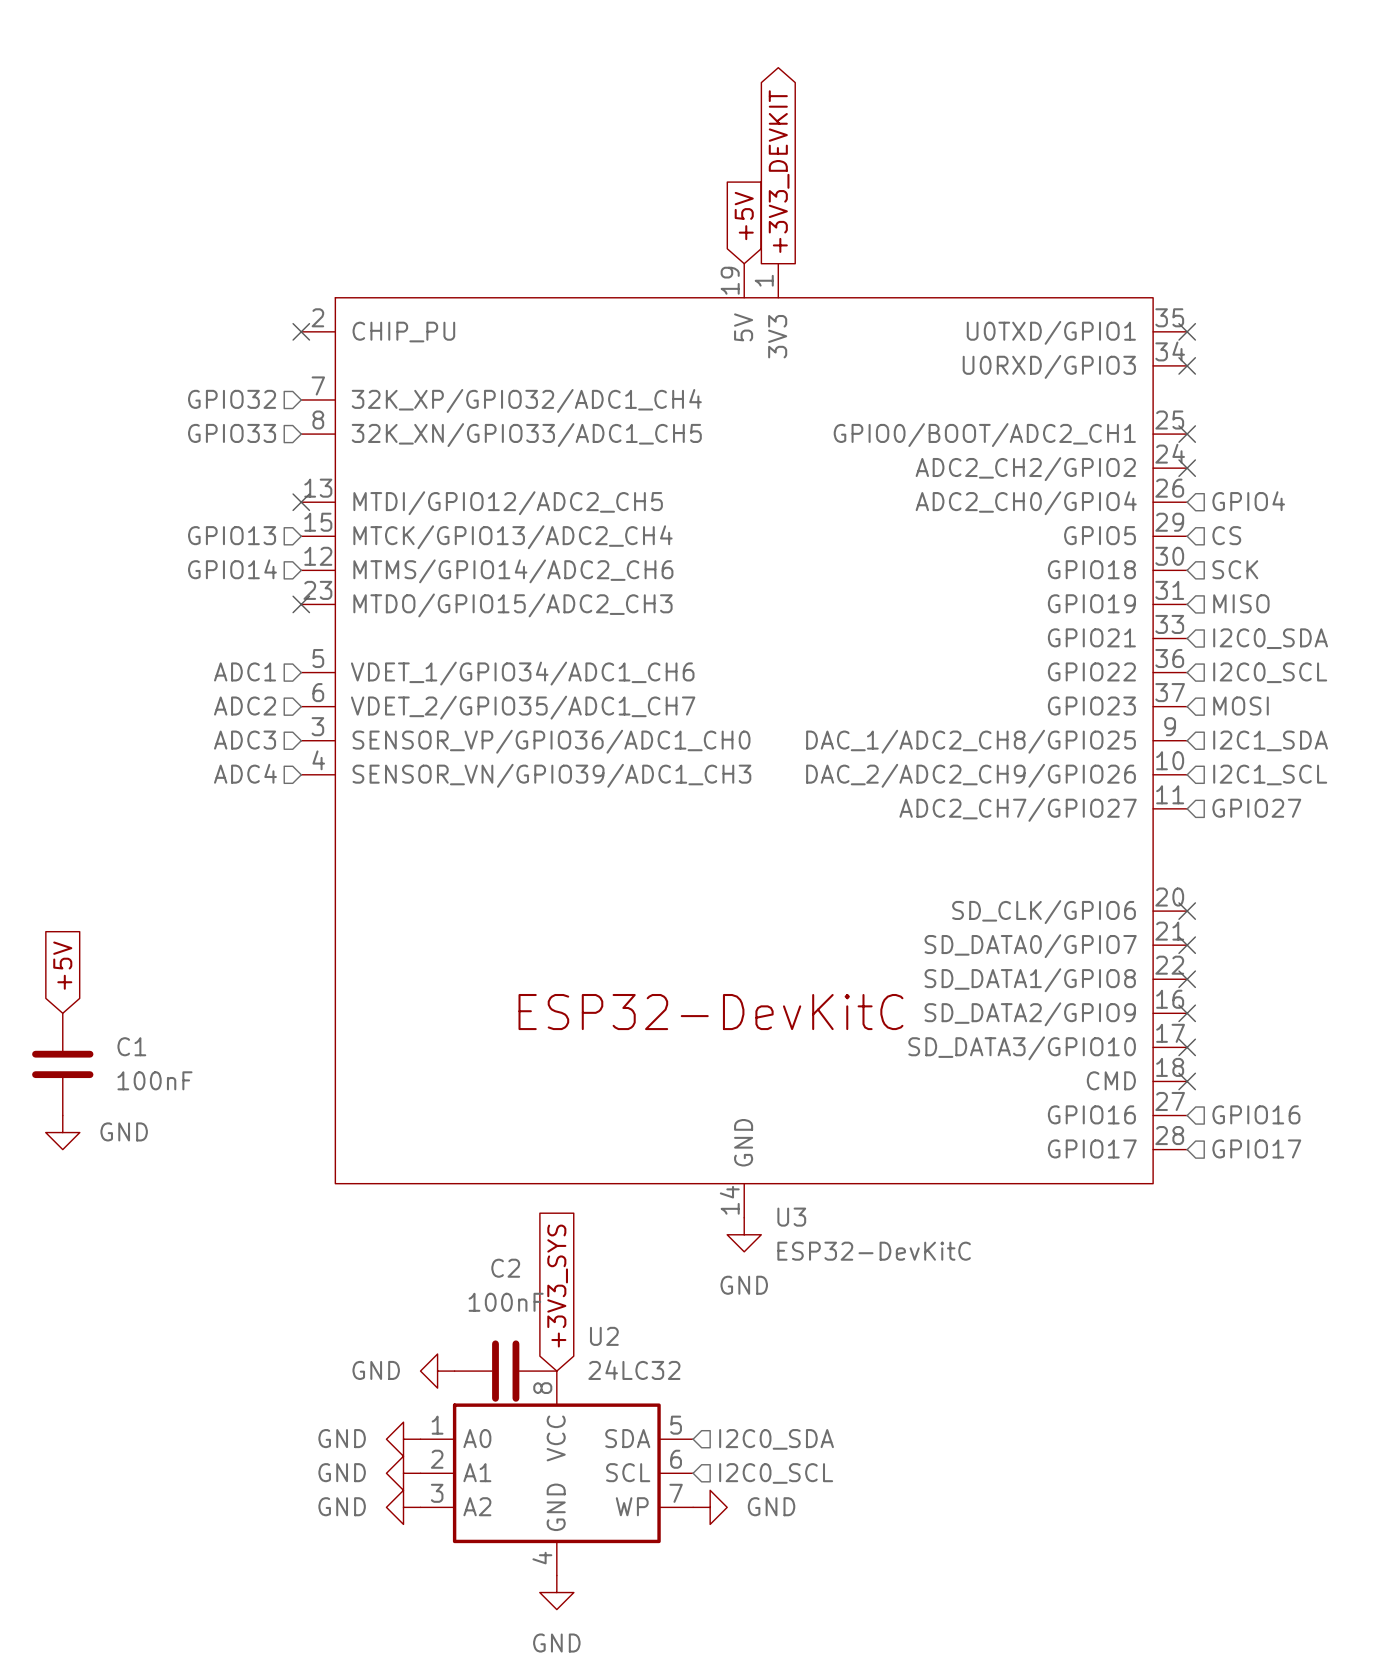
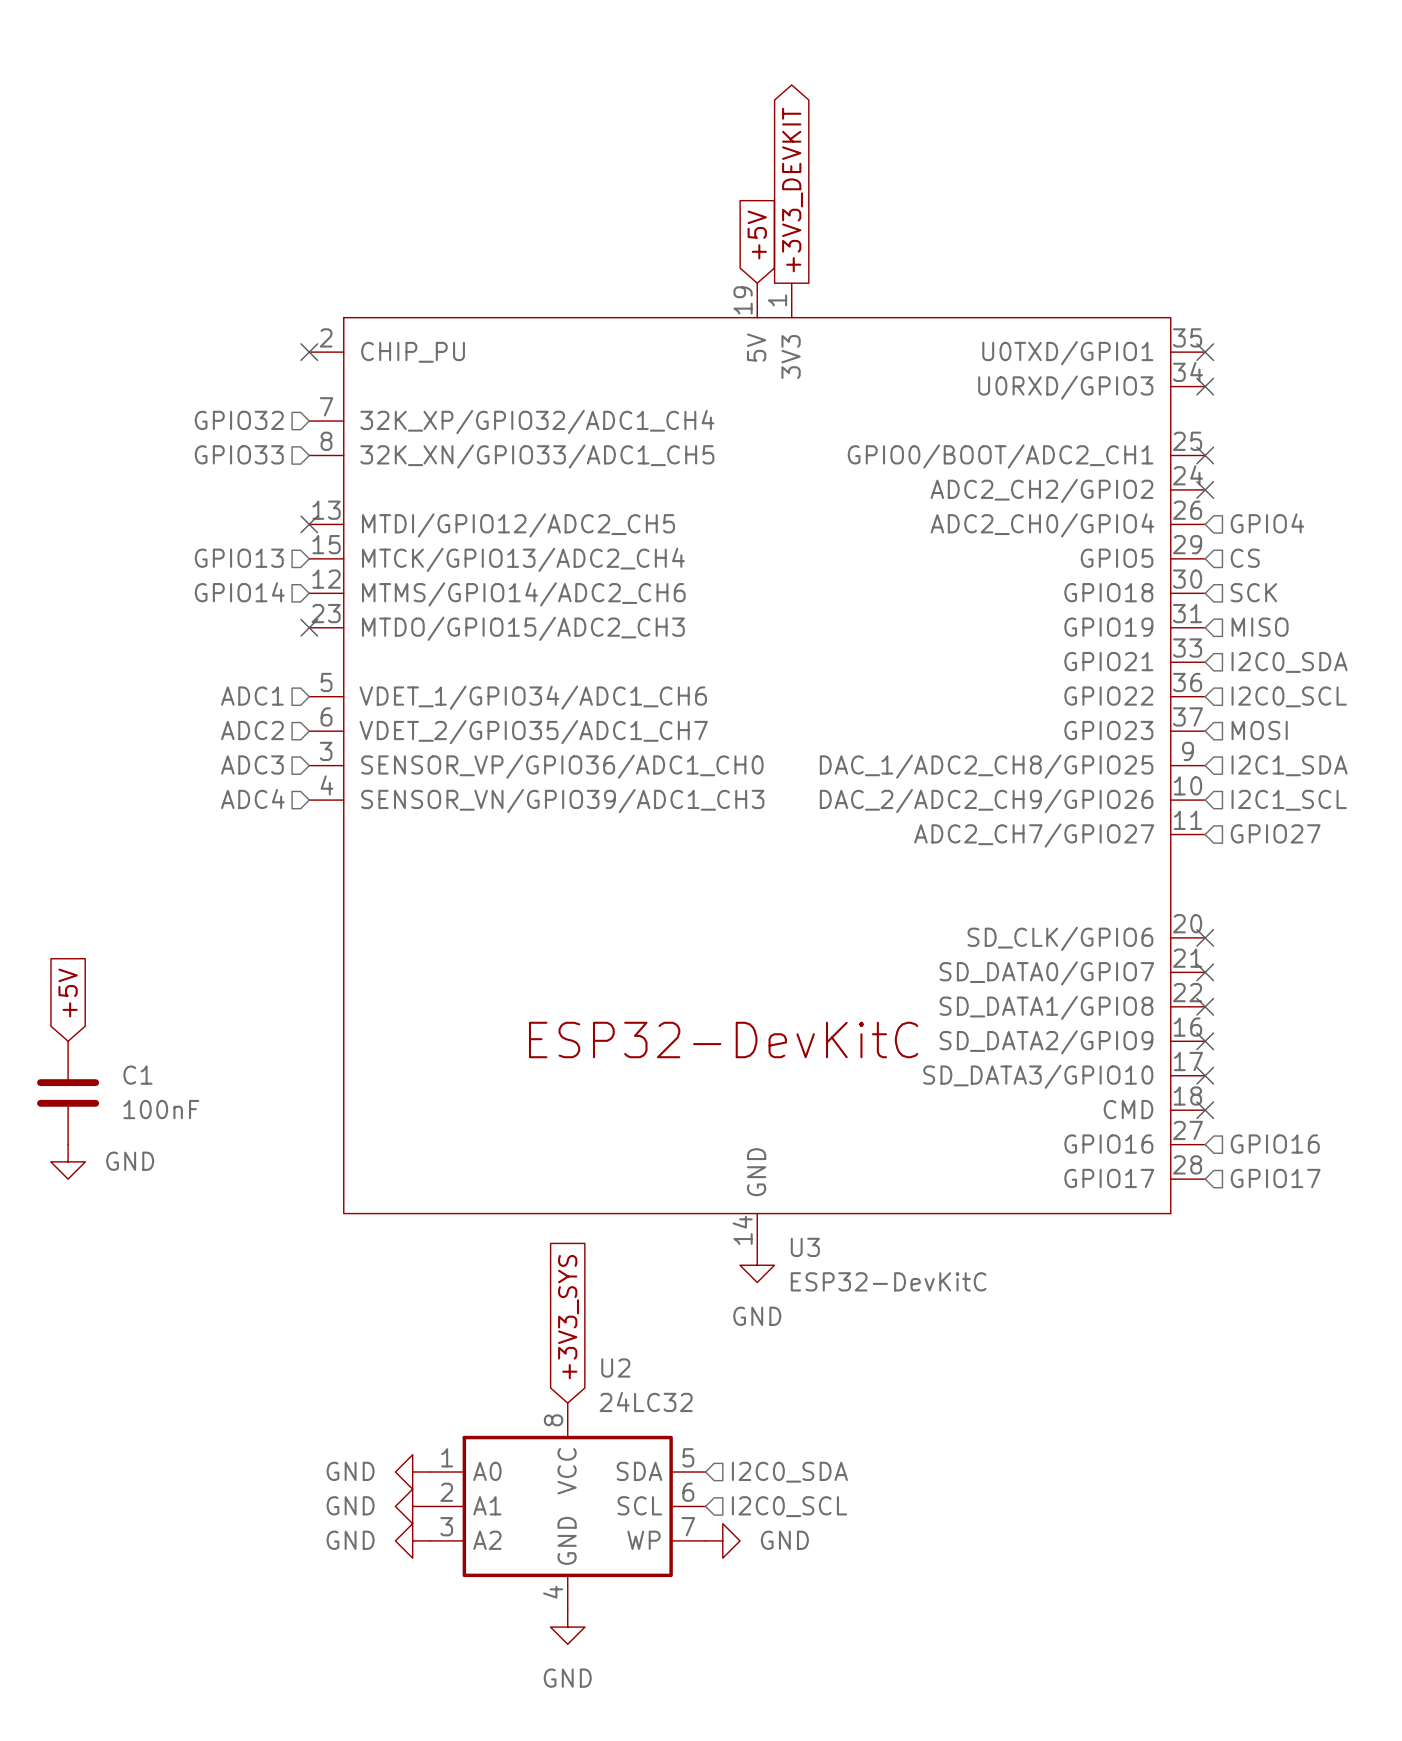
power symbol: GND (437, 1371) -> none
C2: 100nF (505, 1371) -> none

